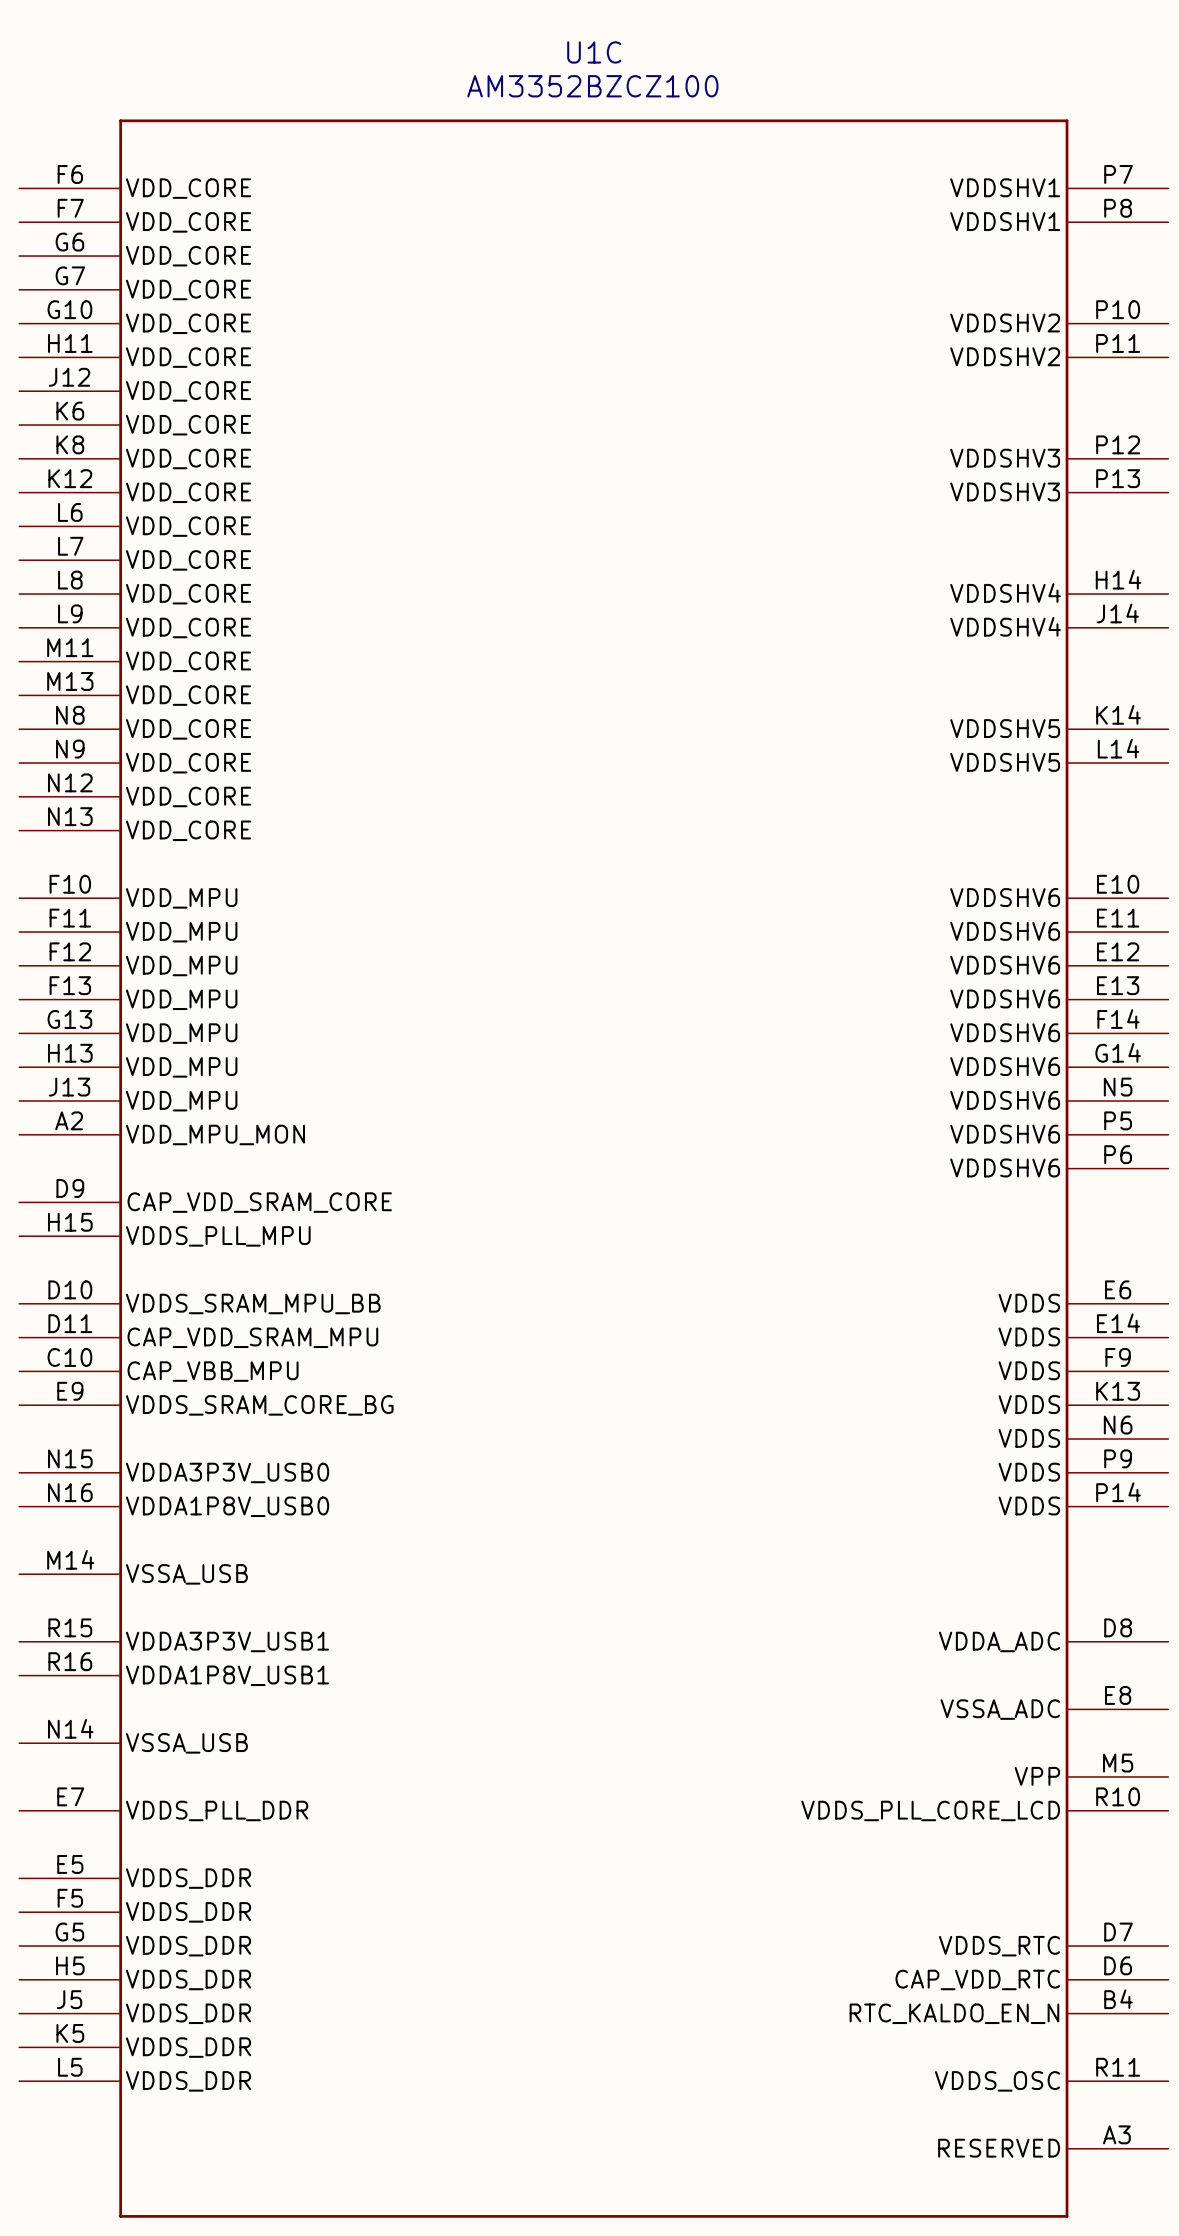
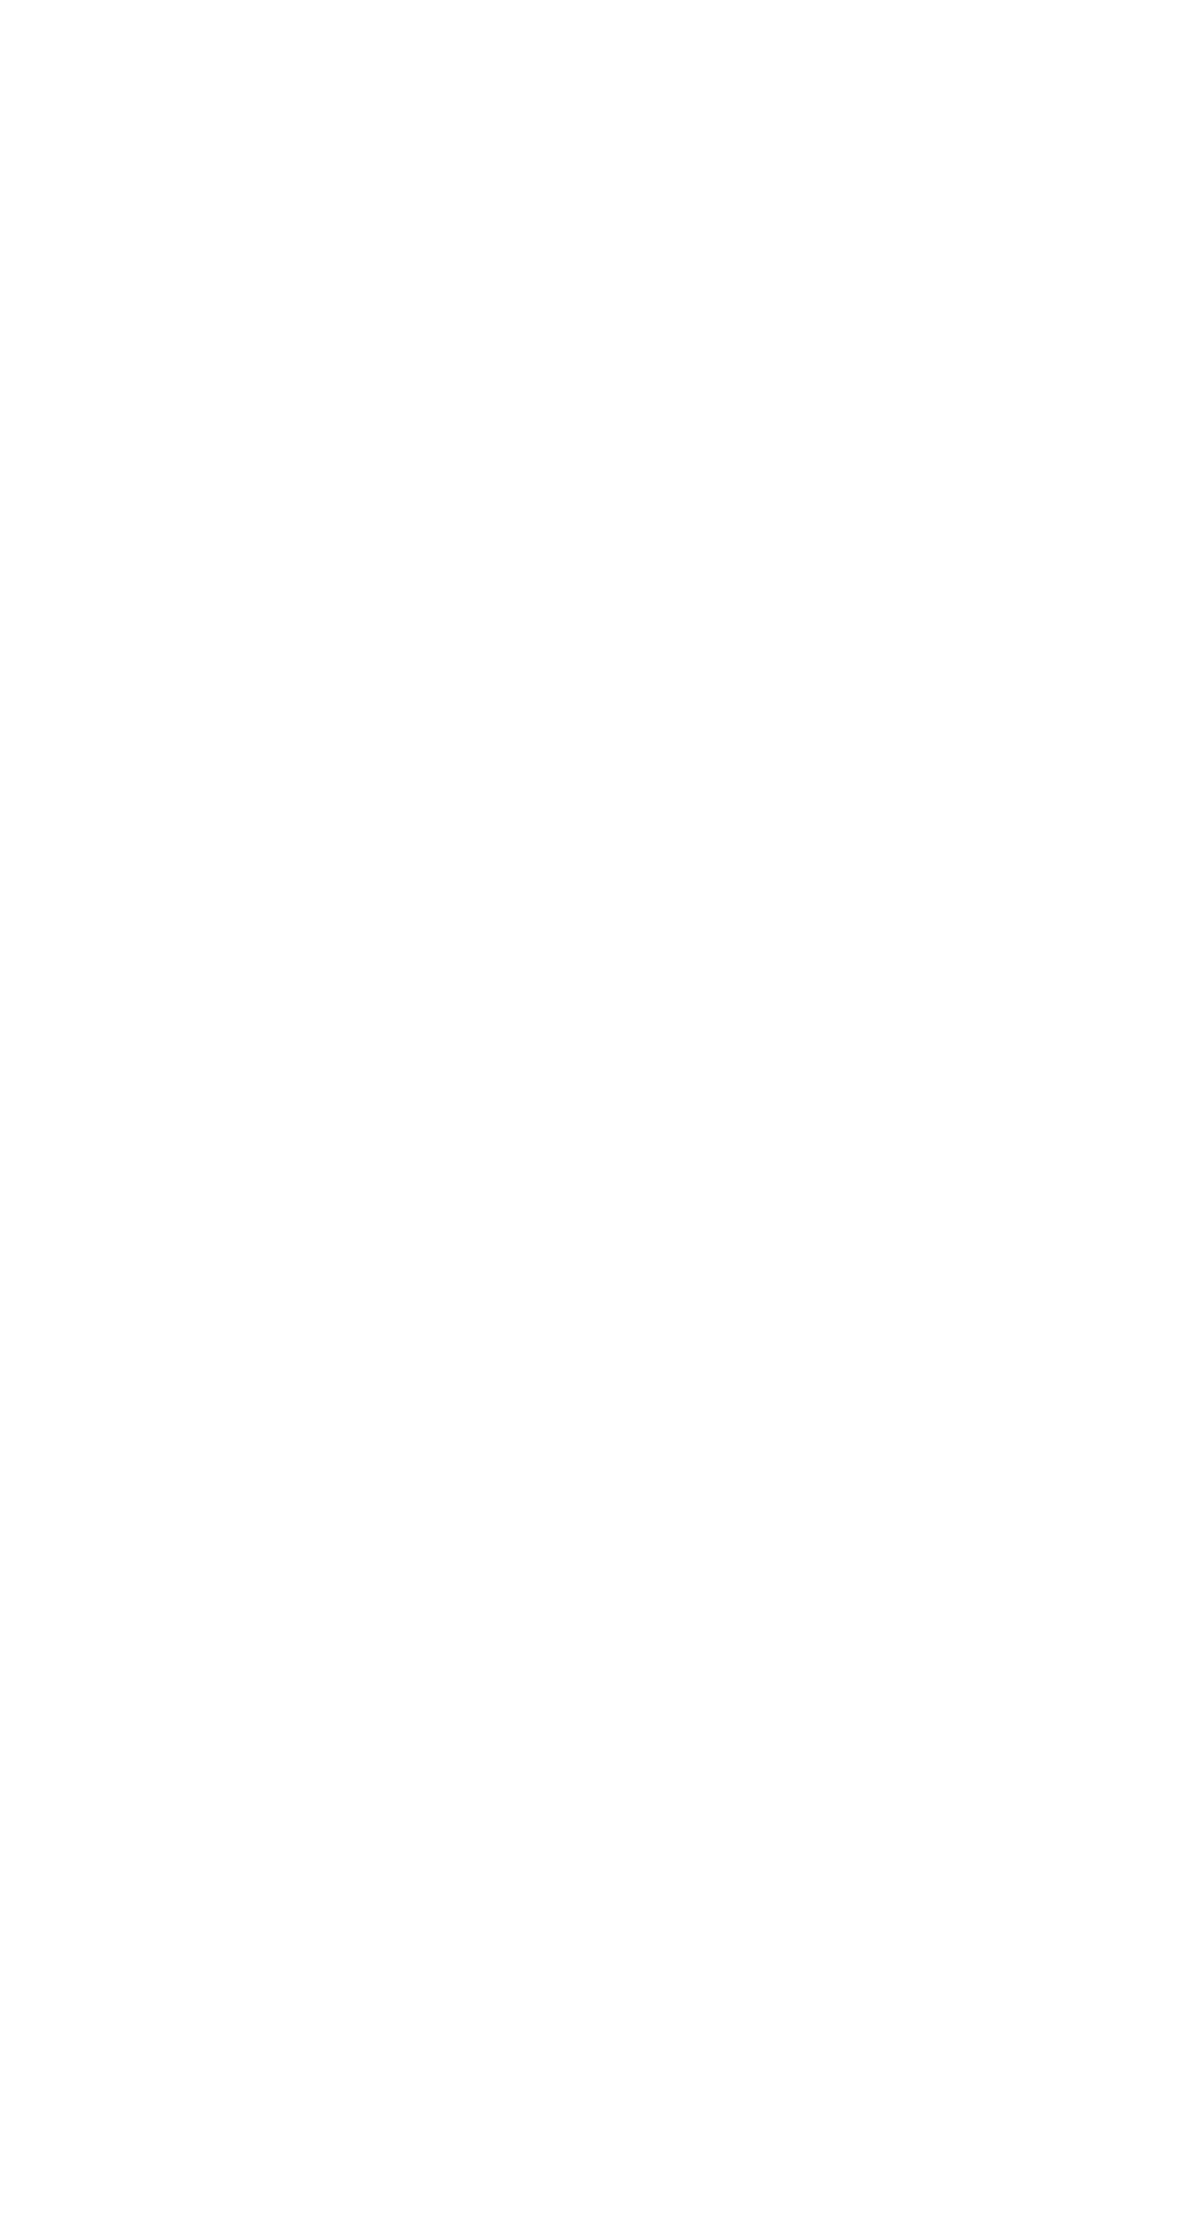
U1C: AM3352BZCZ100 (593, 1168) -> none

